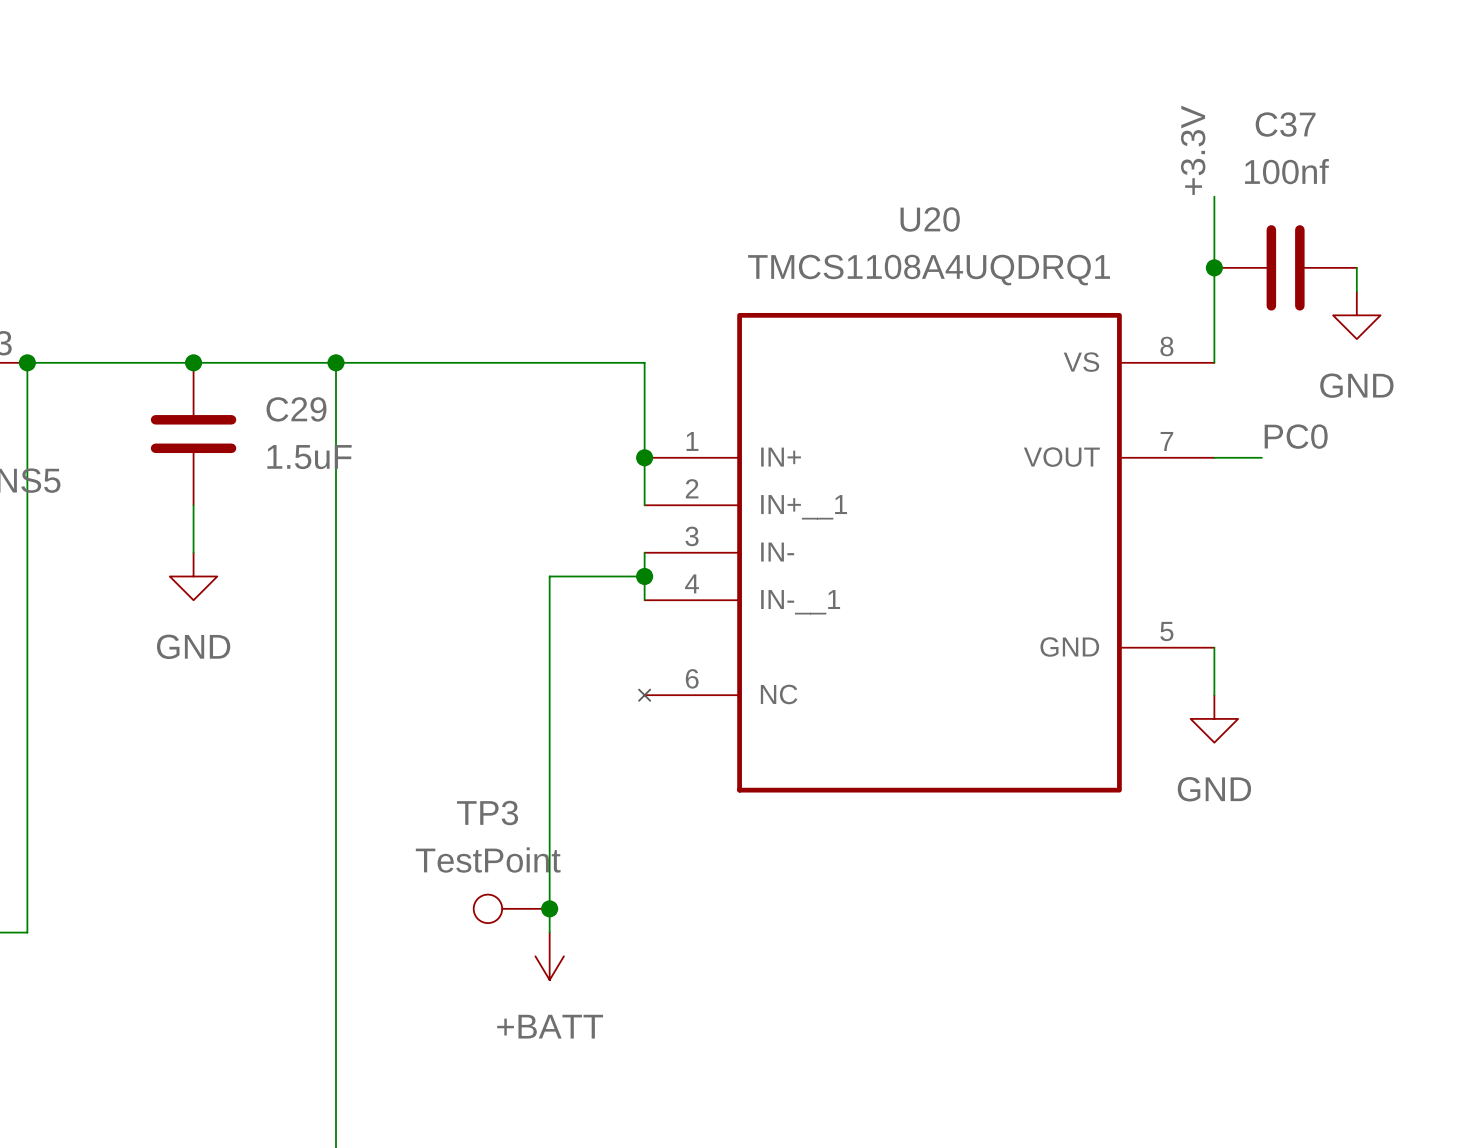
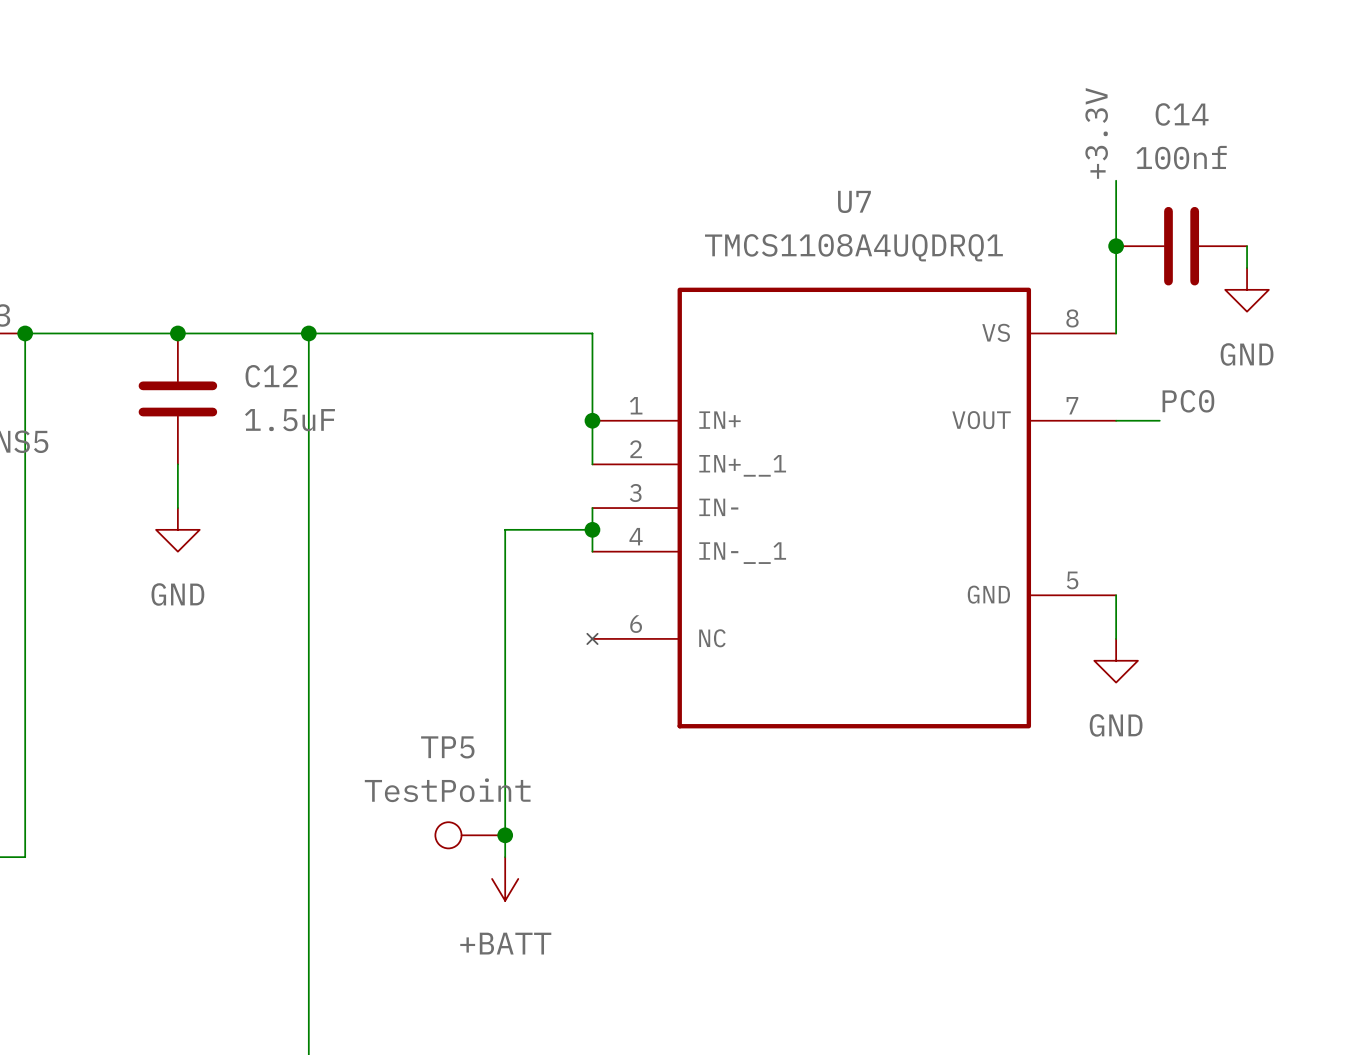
C37 name: C37 (1285, 124) -> C14 (1182, 114)
U20 name: U20 (930, 219) -> U7 (854, 201)
C29 name: C29 (296, 409) -> C12 (271, 376)
TP3 name: TP3 (487, 812) -> TP5 (447, 747)

